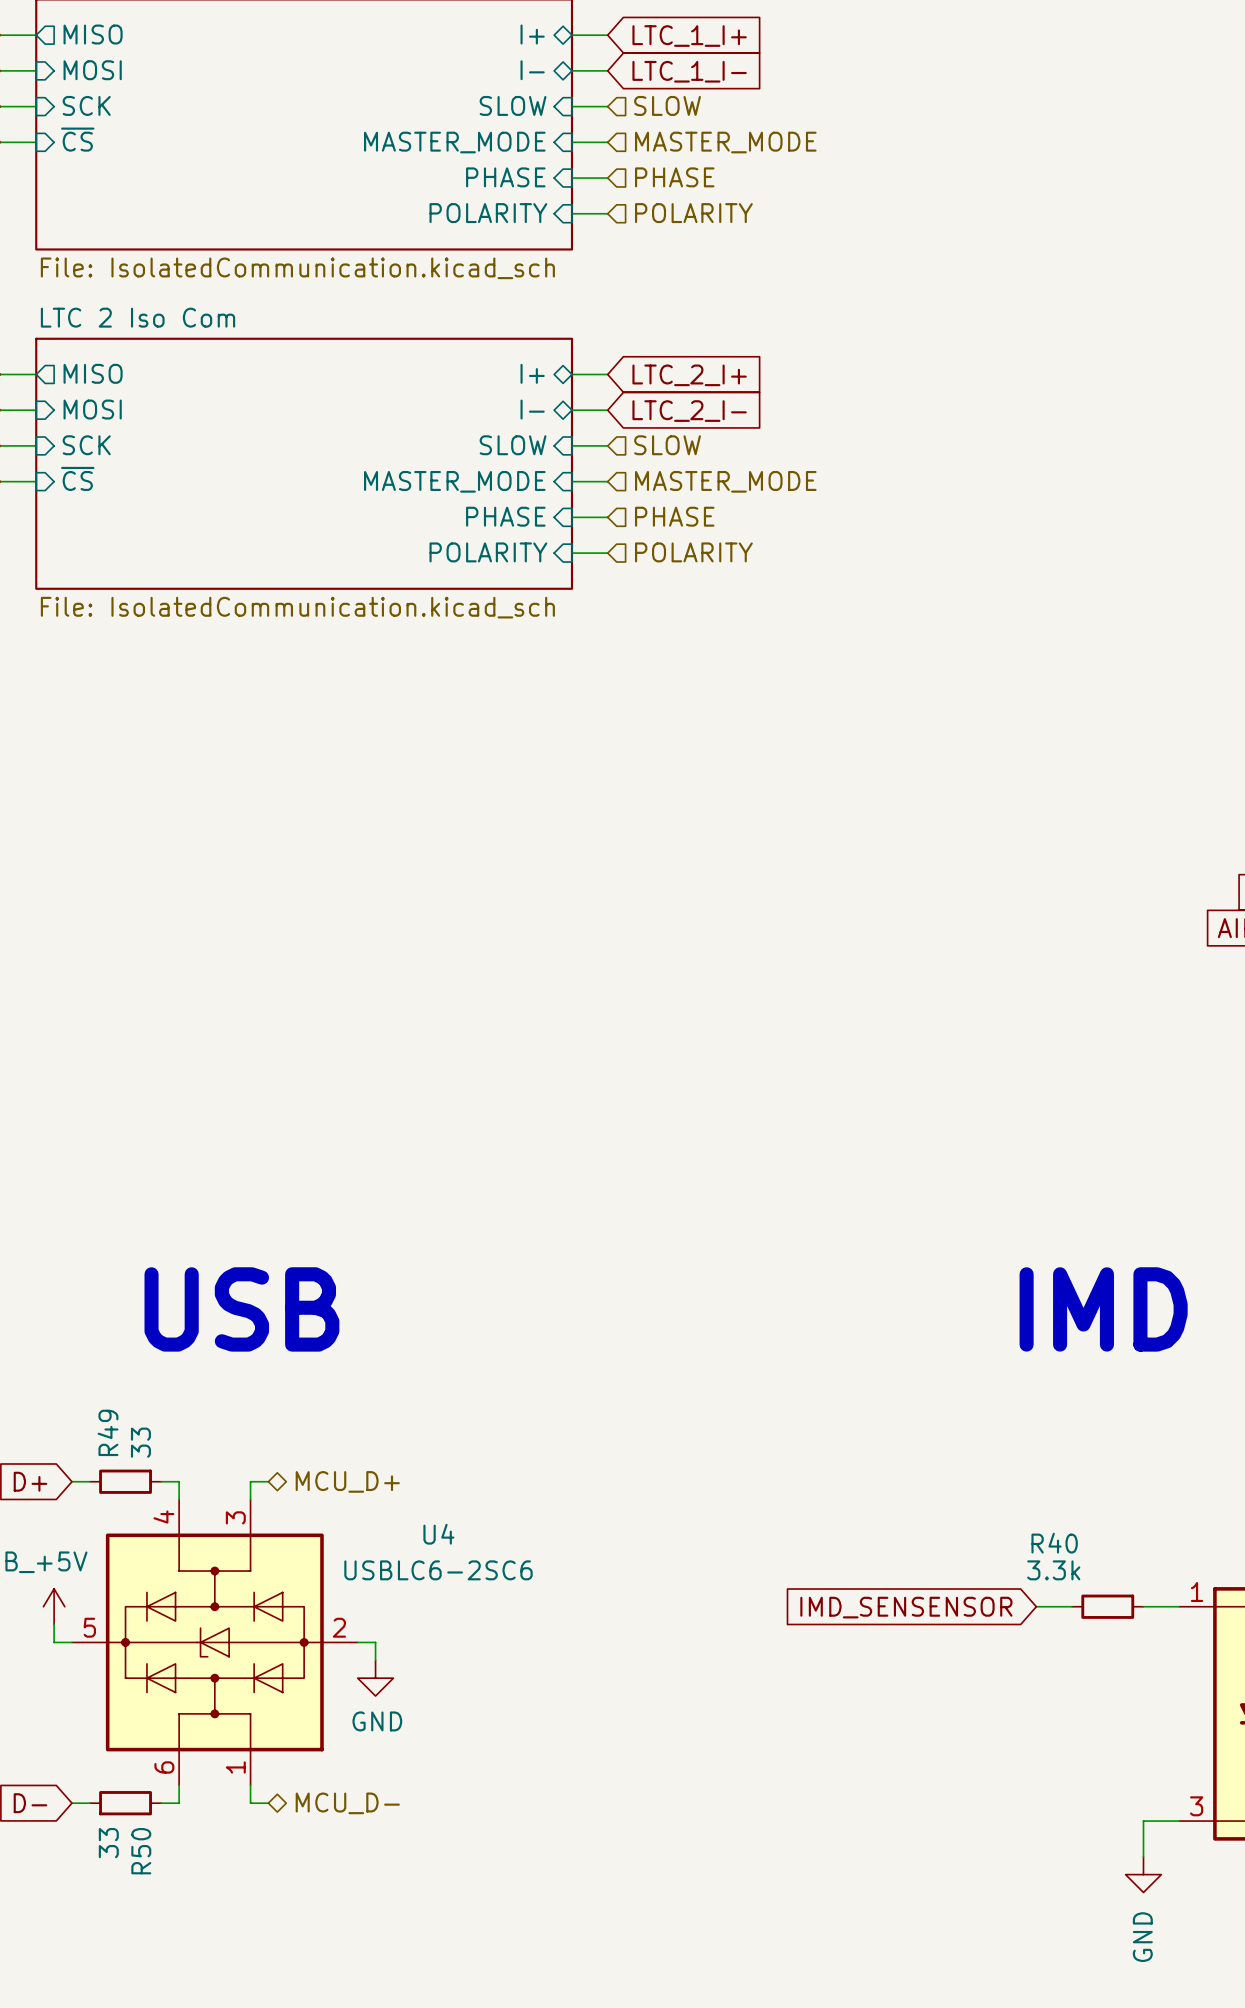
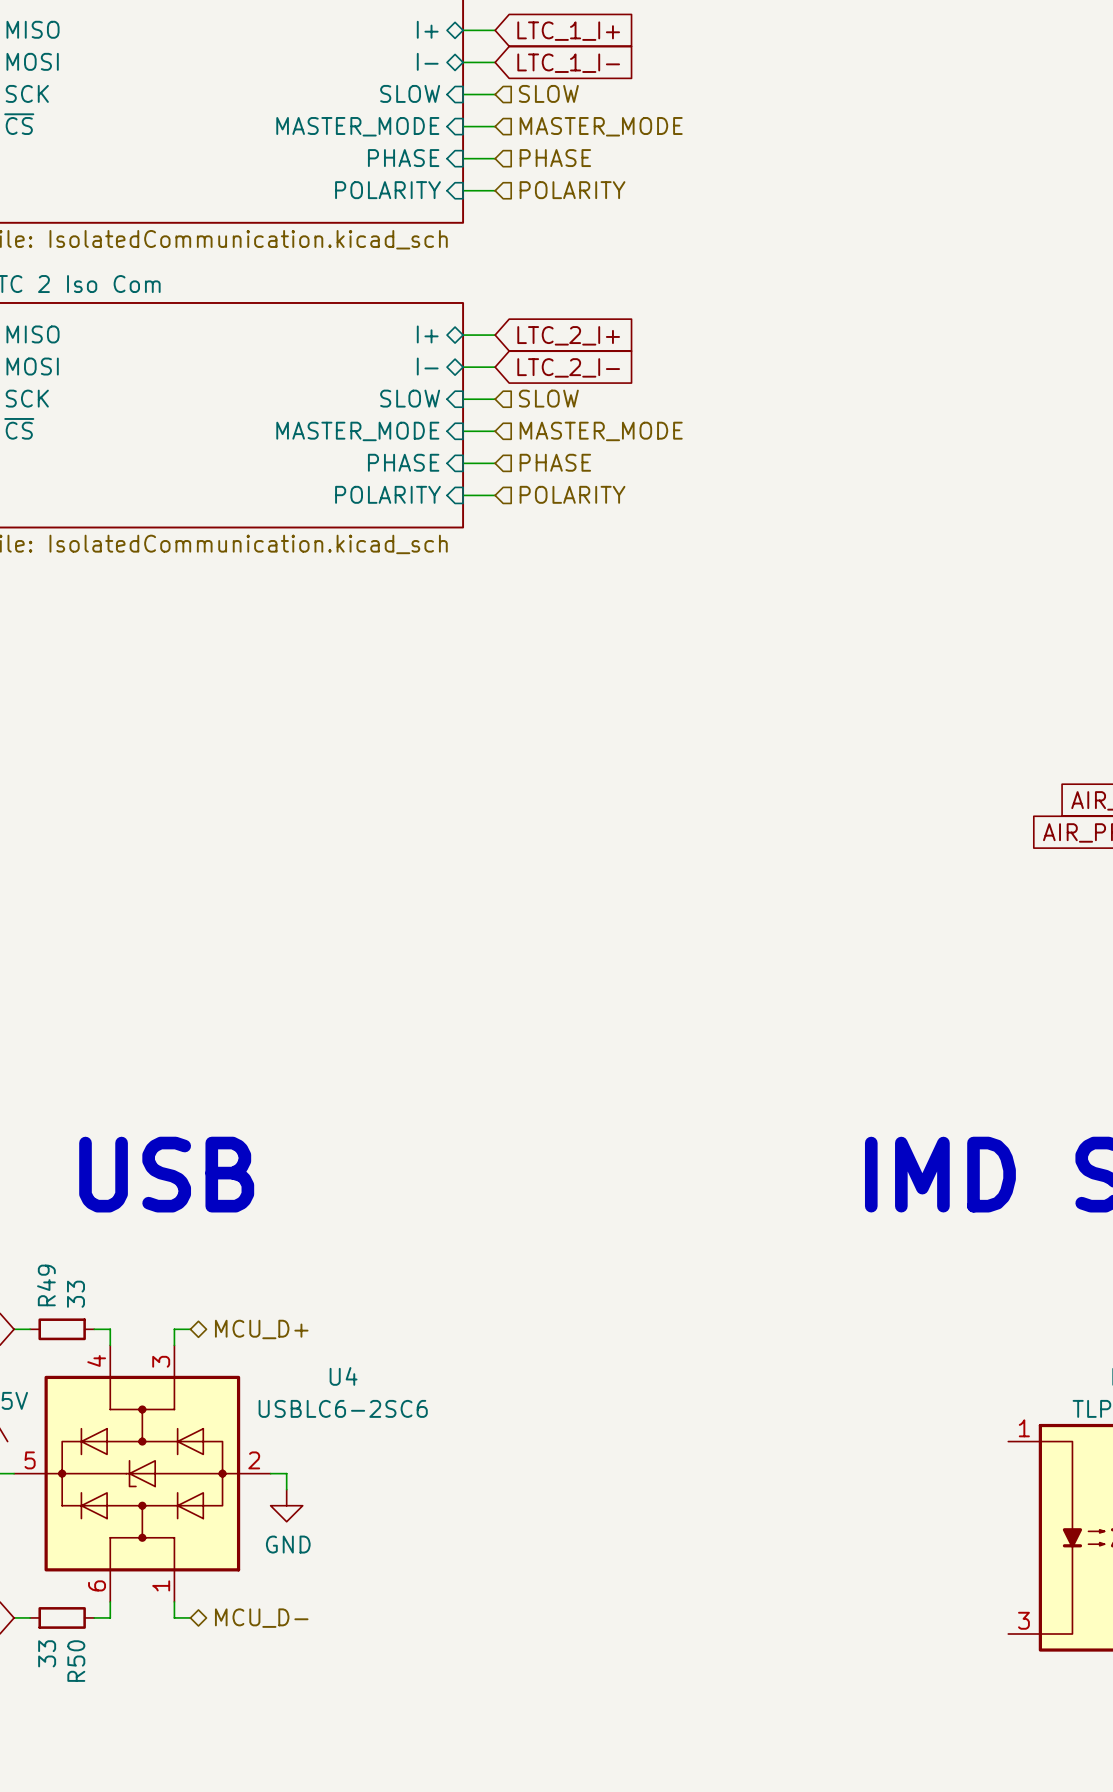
wire: (1036, 1606) (1072, 1606) -> none
R40: 3.3k (1107, 1606) -> none
wire: (1143, 1606) (1179, 1606) -> none
global label: IMD_SENSENSOR (906, 1607) -> none
wire: (1179, 1821) (1143, 1821) (1143, 1856) -> none
power symbol: GND (1143, 1874) -> none

